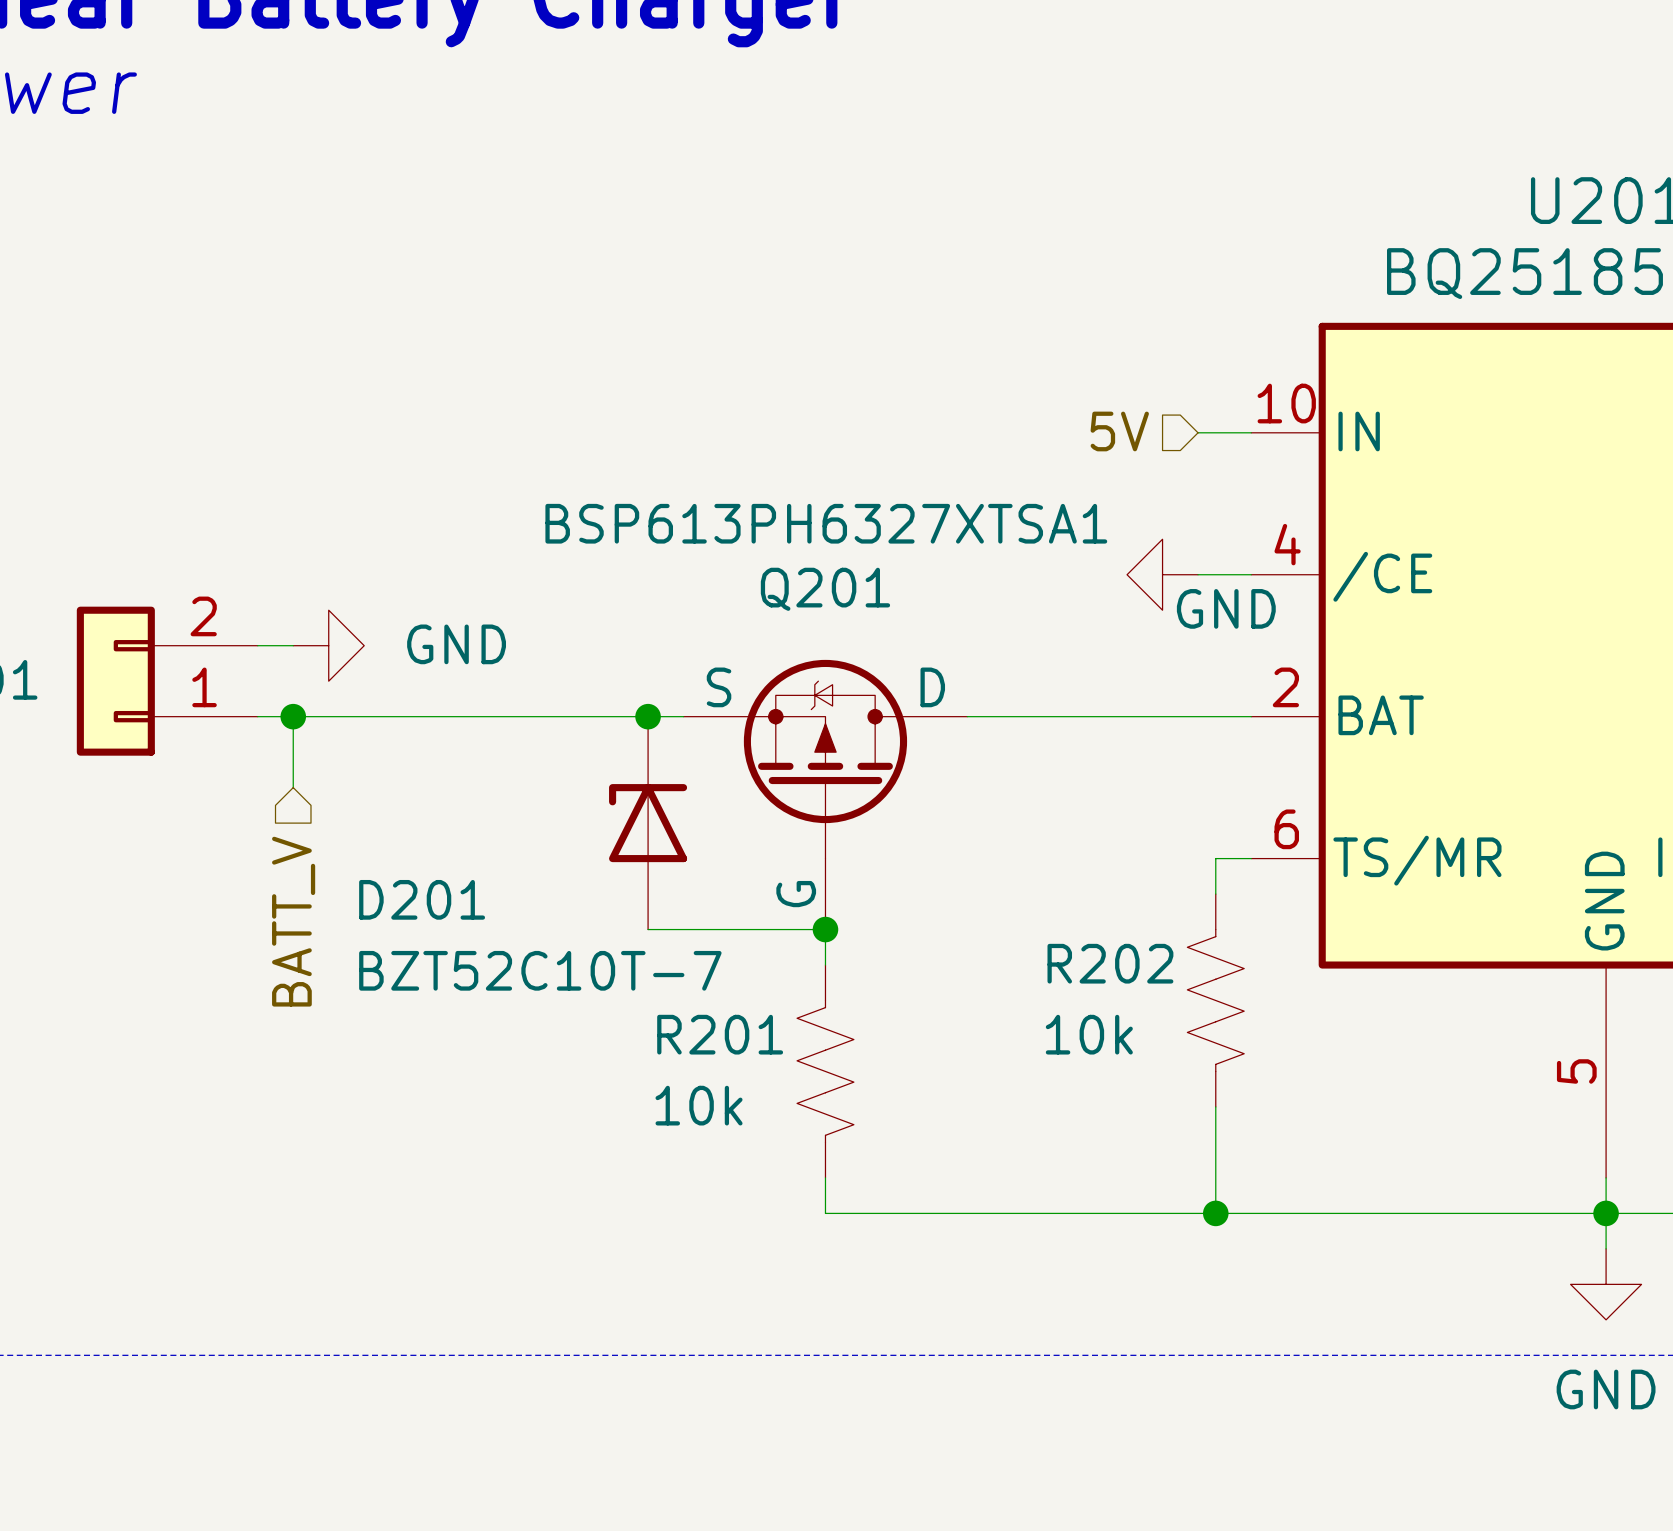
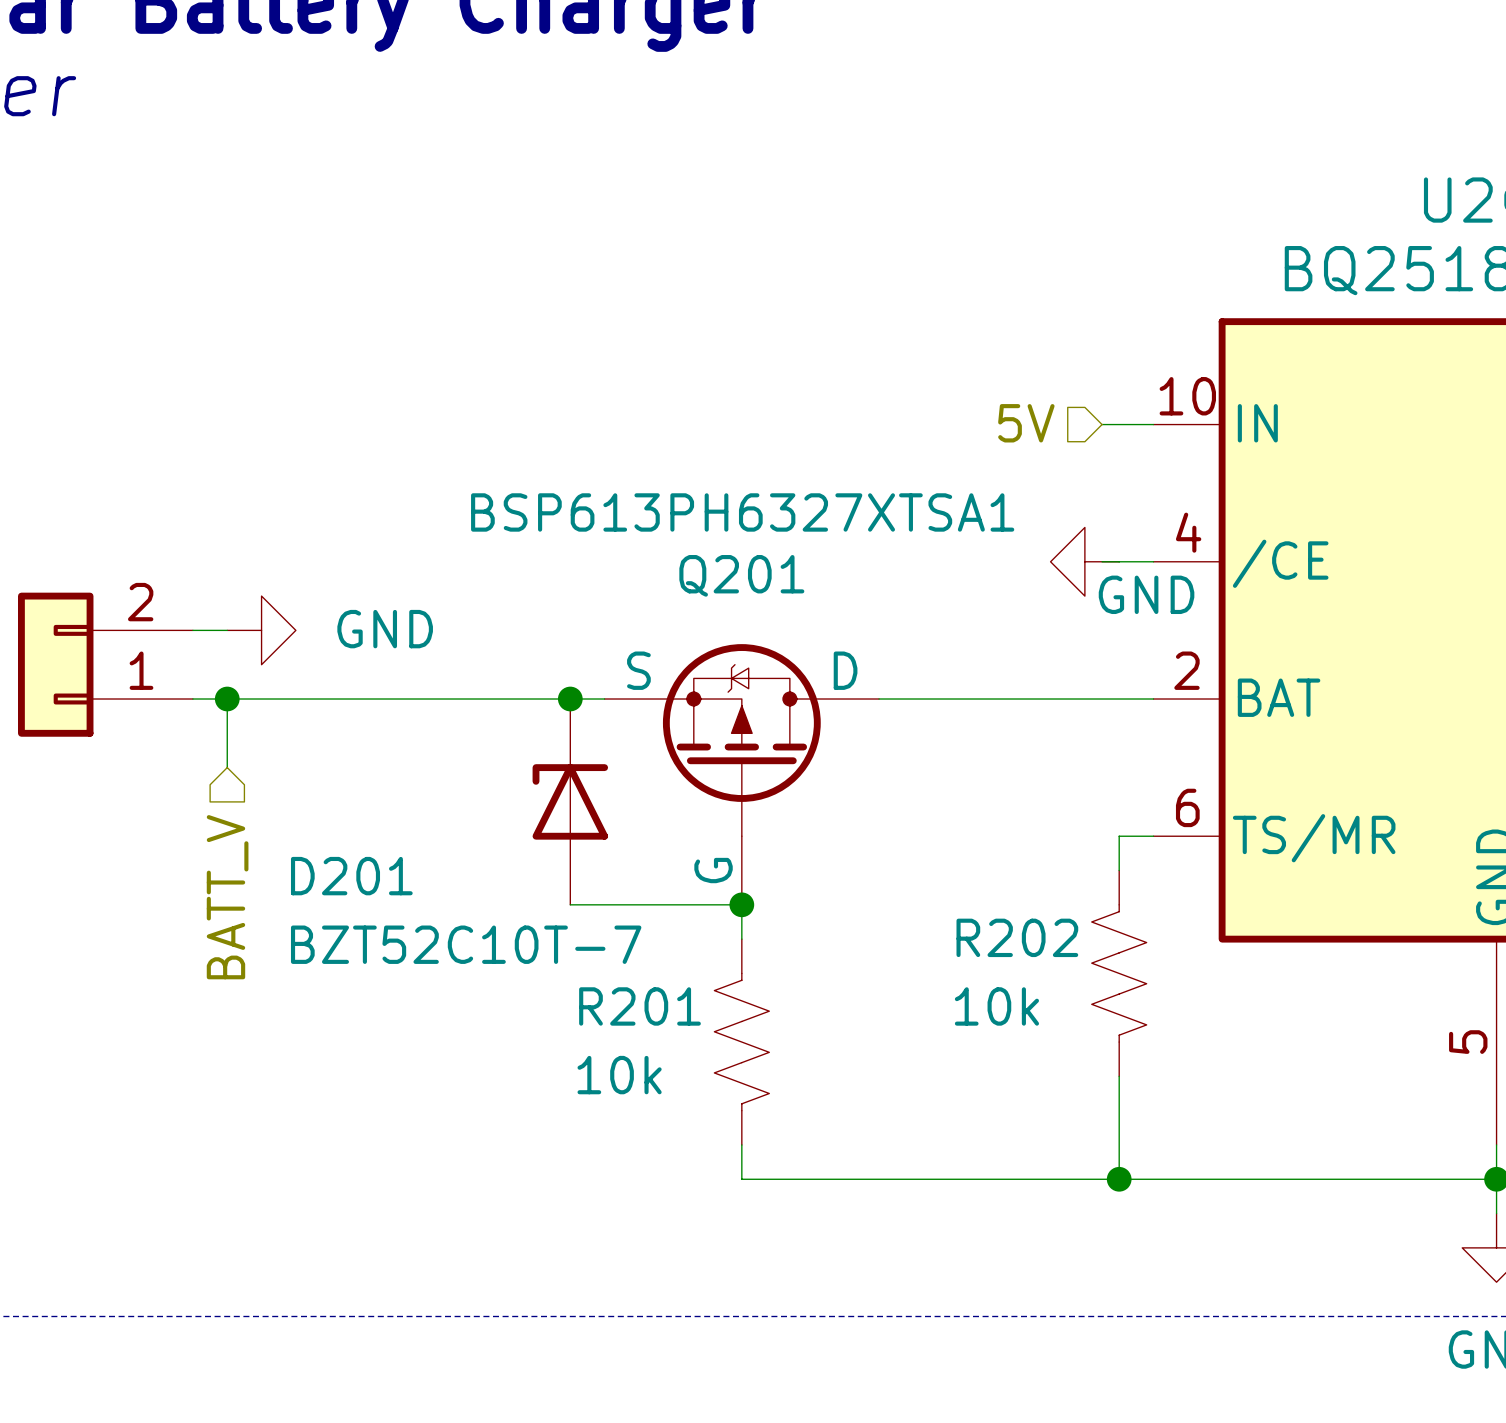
power symbol position: GND (1162, 574) -> GND (1084, 561)

